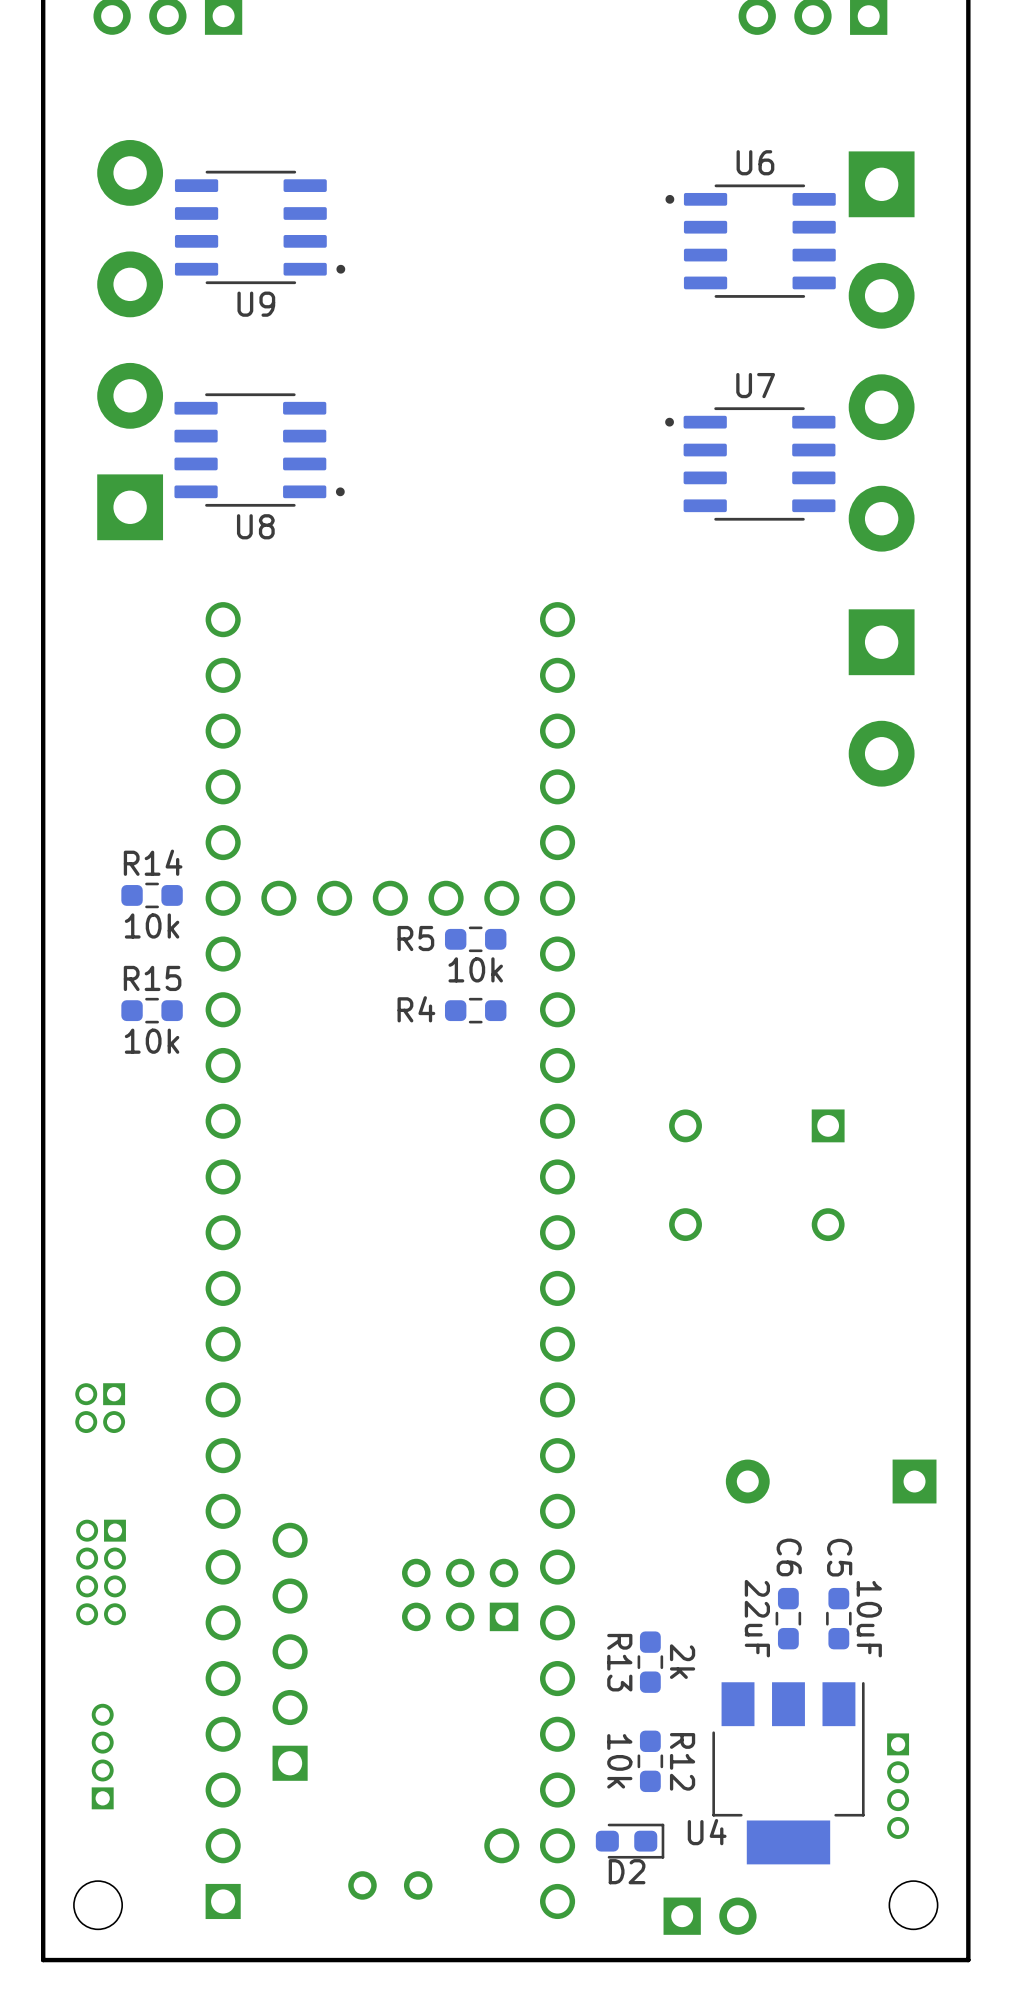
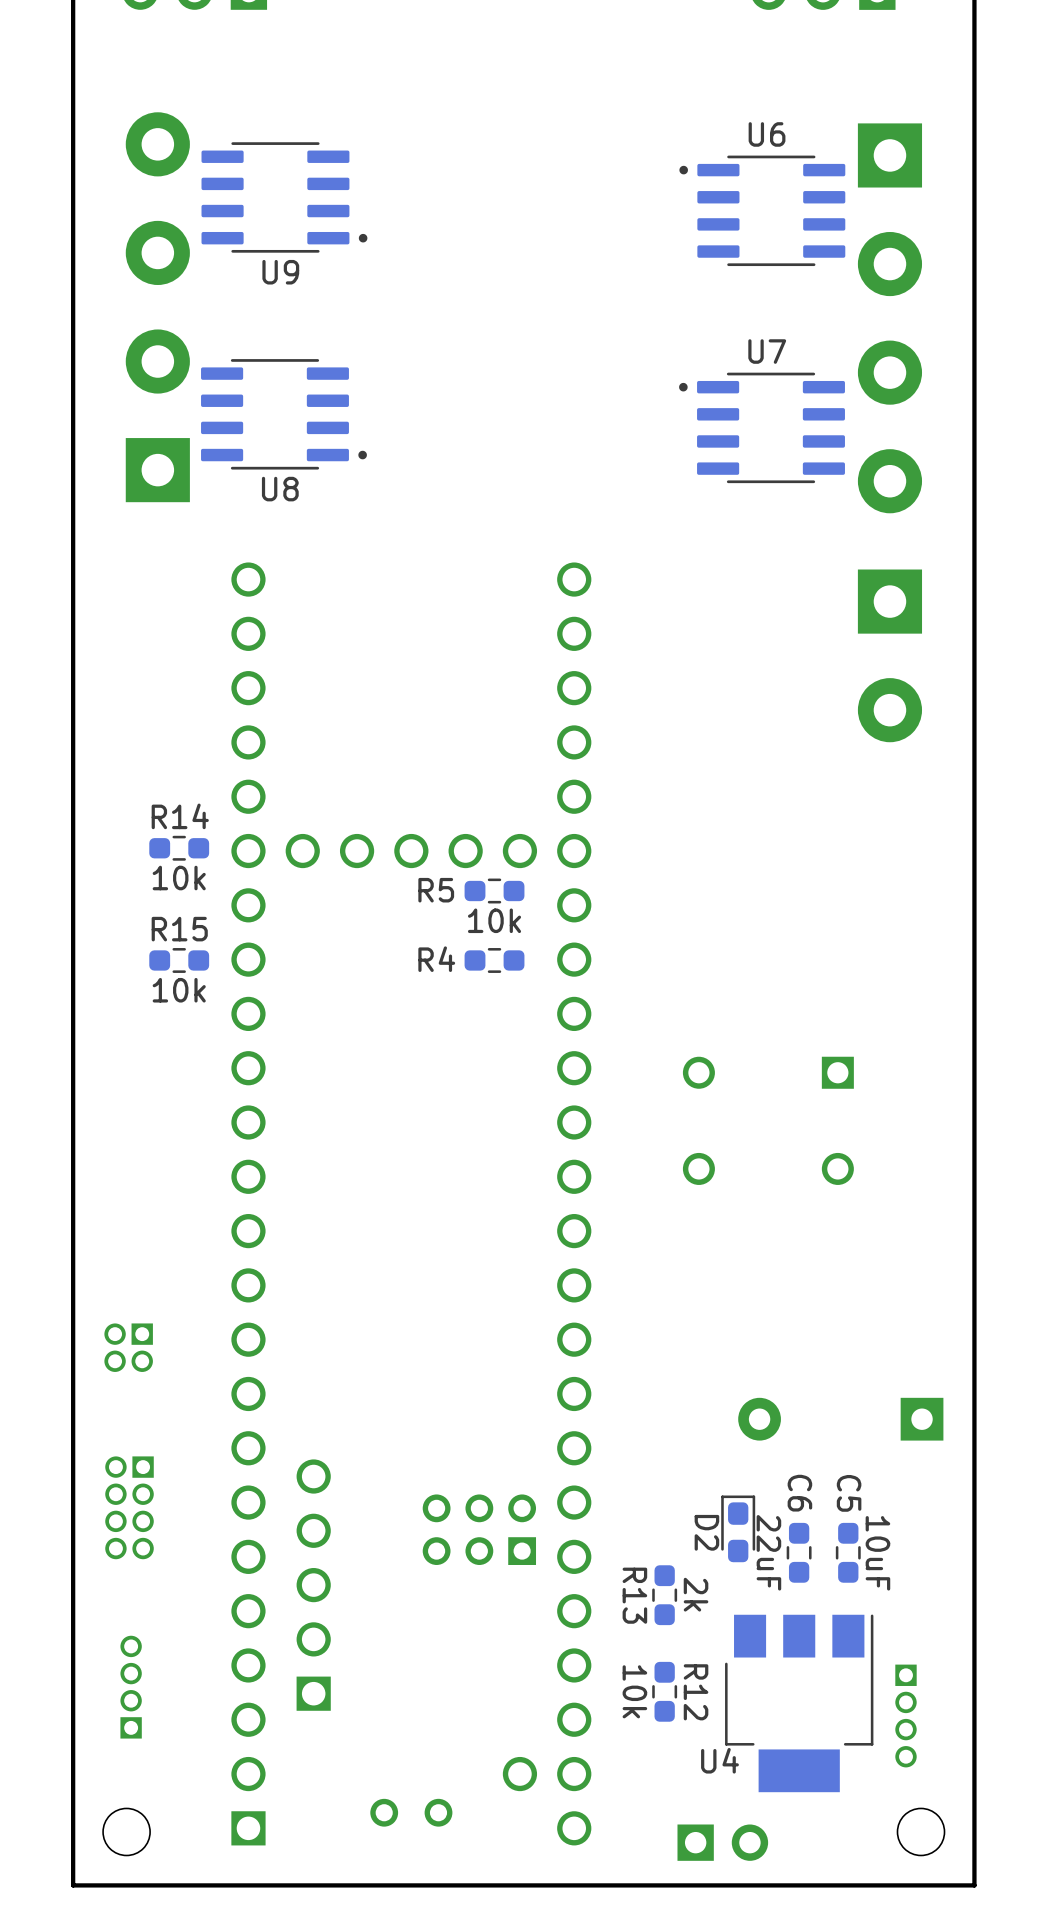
D2 rotation: 0° (630, 1841) -> 90° counterclockwise (738, 1528)
D2 position: (630, 1841) -> (738, 1528)

